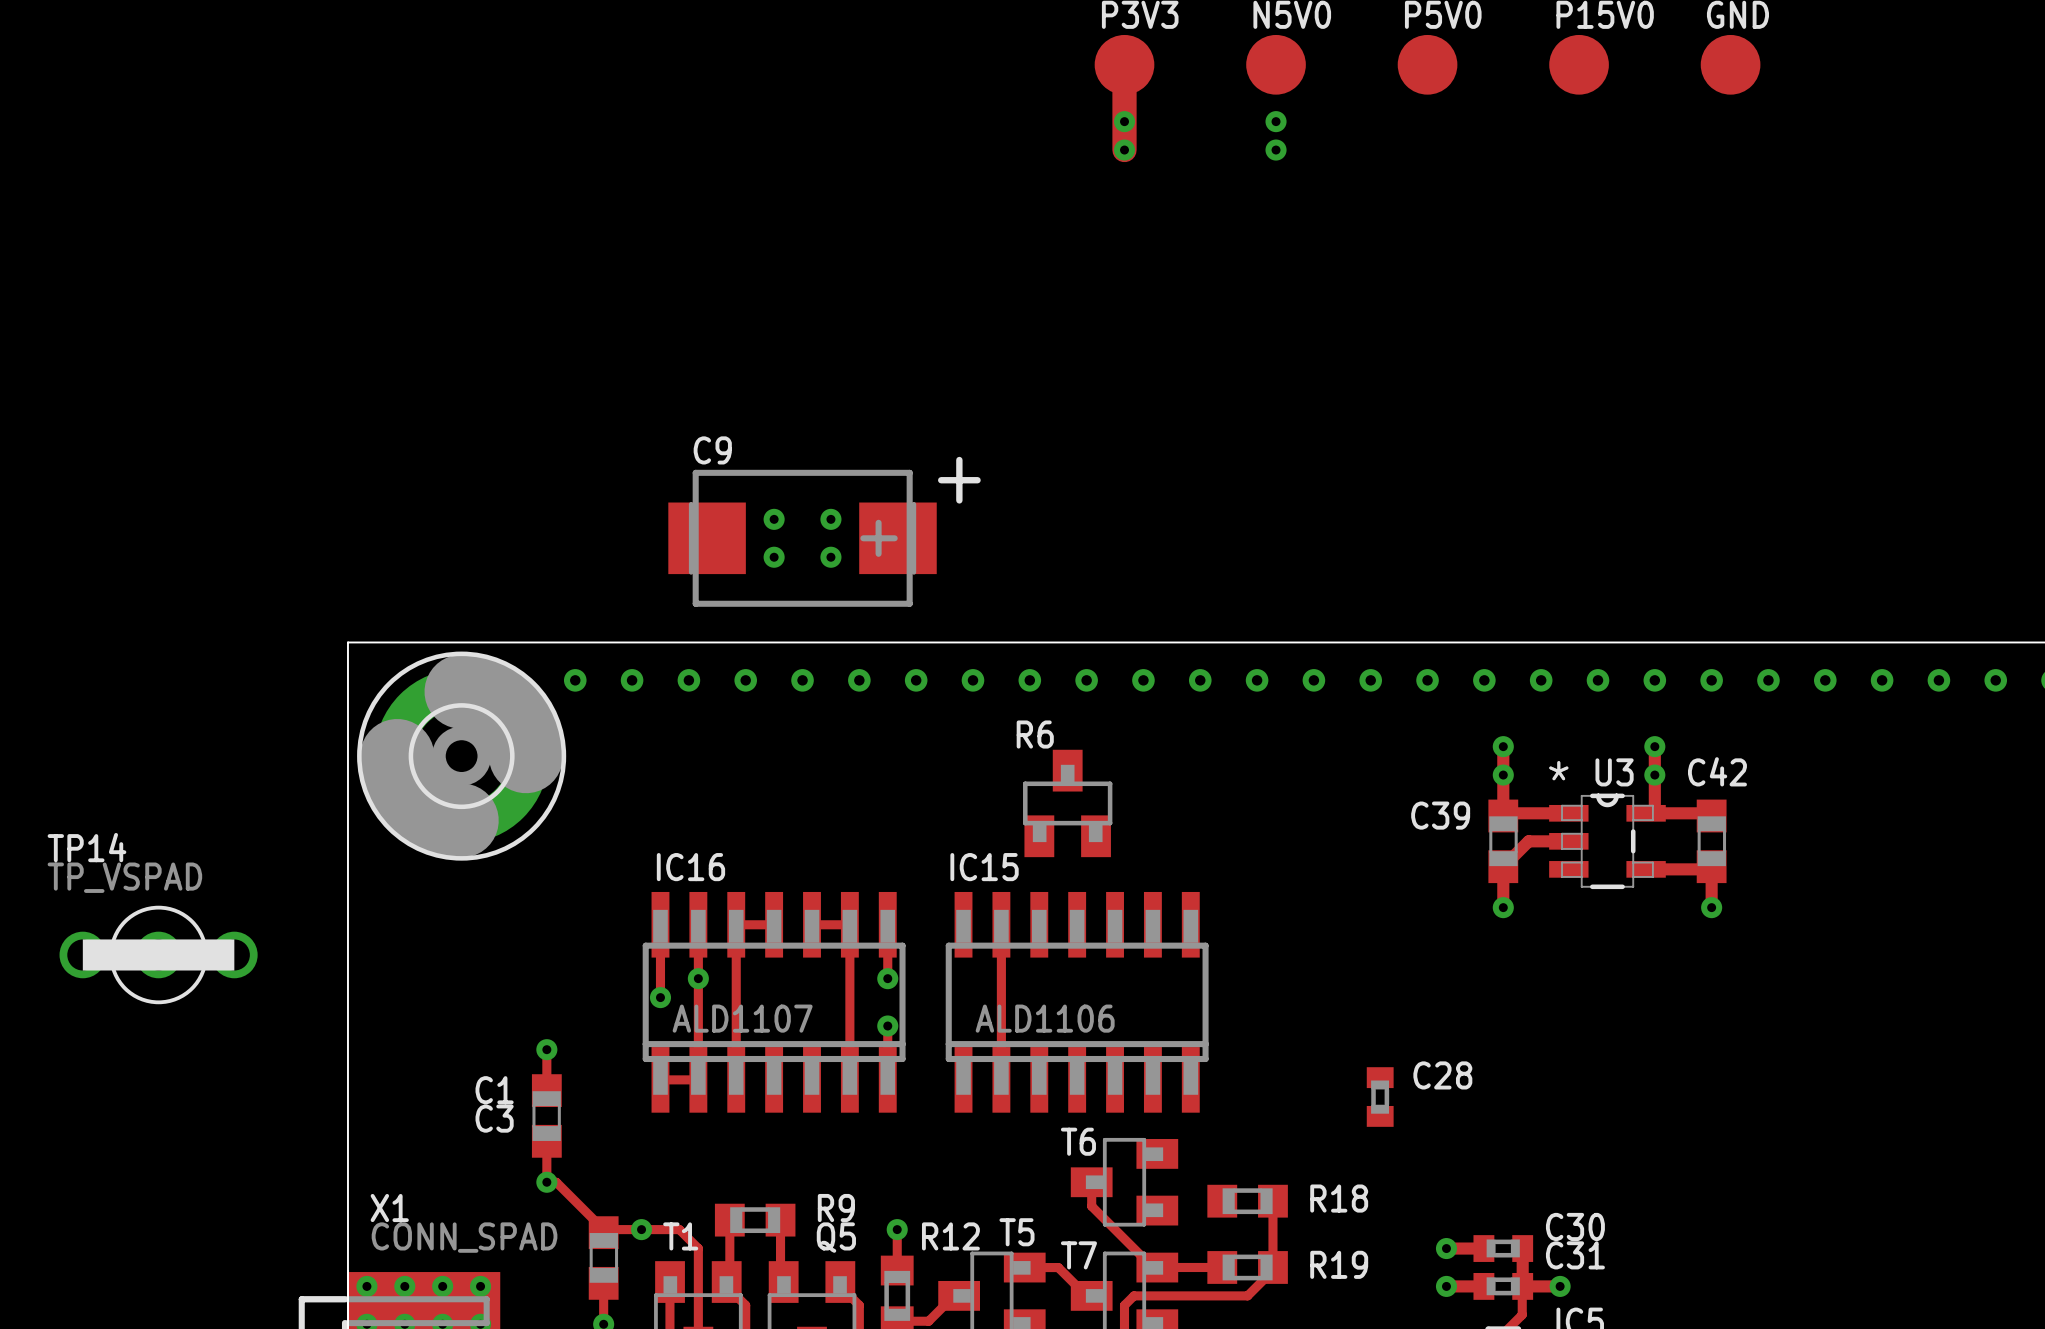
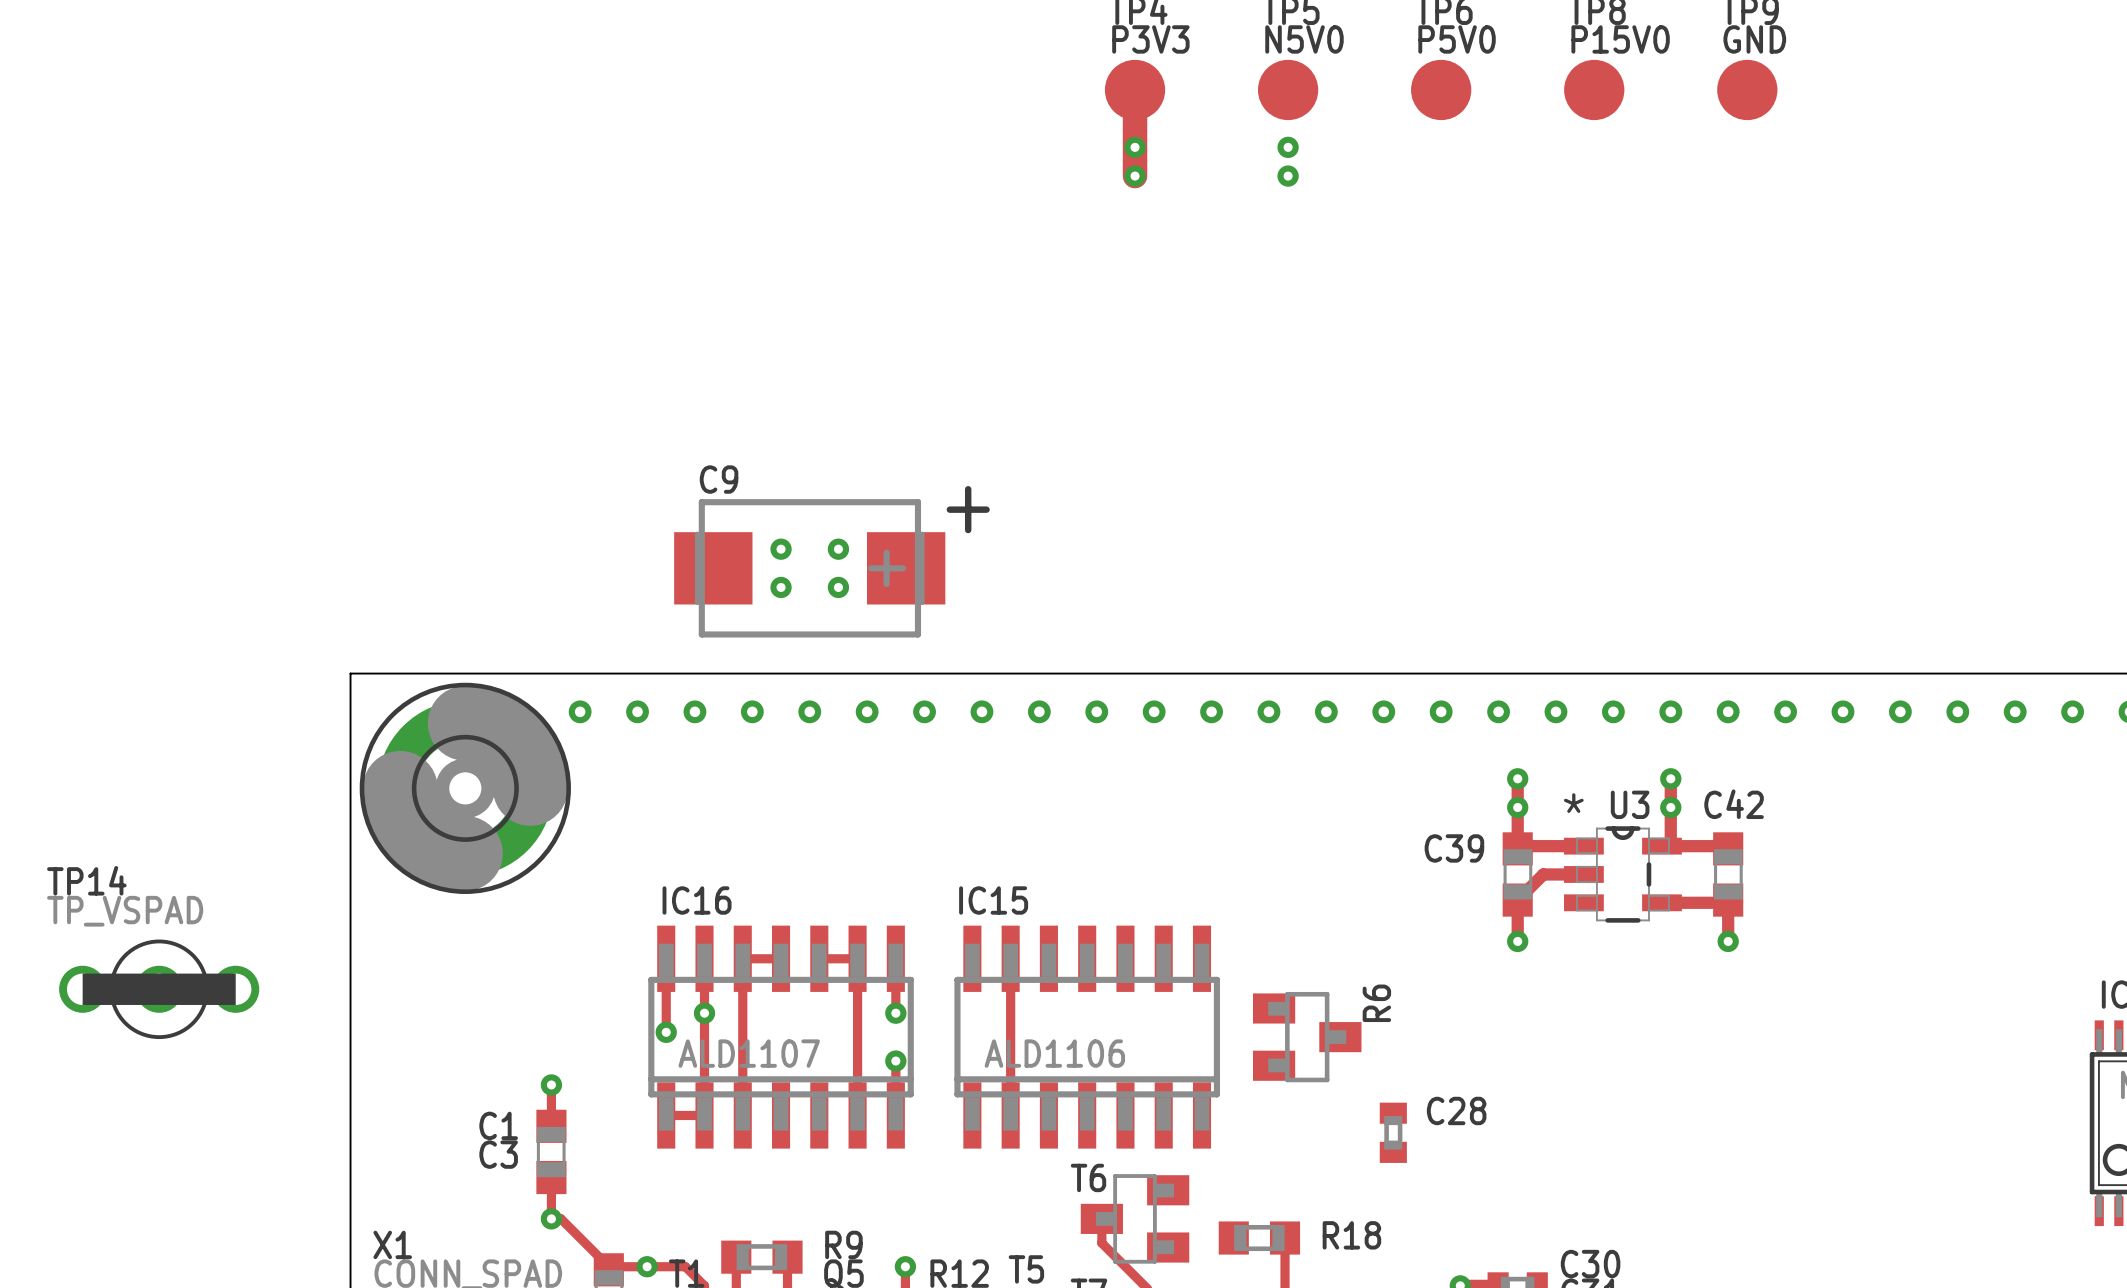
R6 rotation: 0° (1067, 803) -> 90° clockwise (1307, 1037)
R6 position: (1067, 803) -> (1307, 1037)

